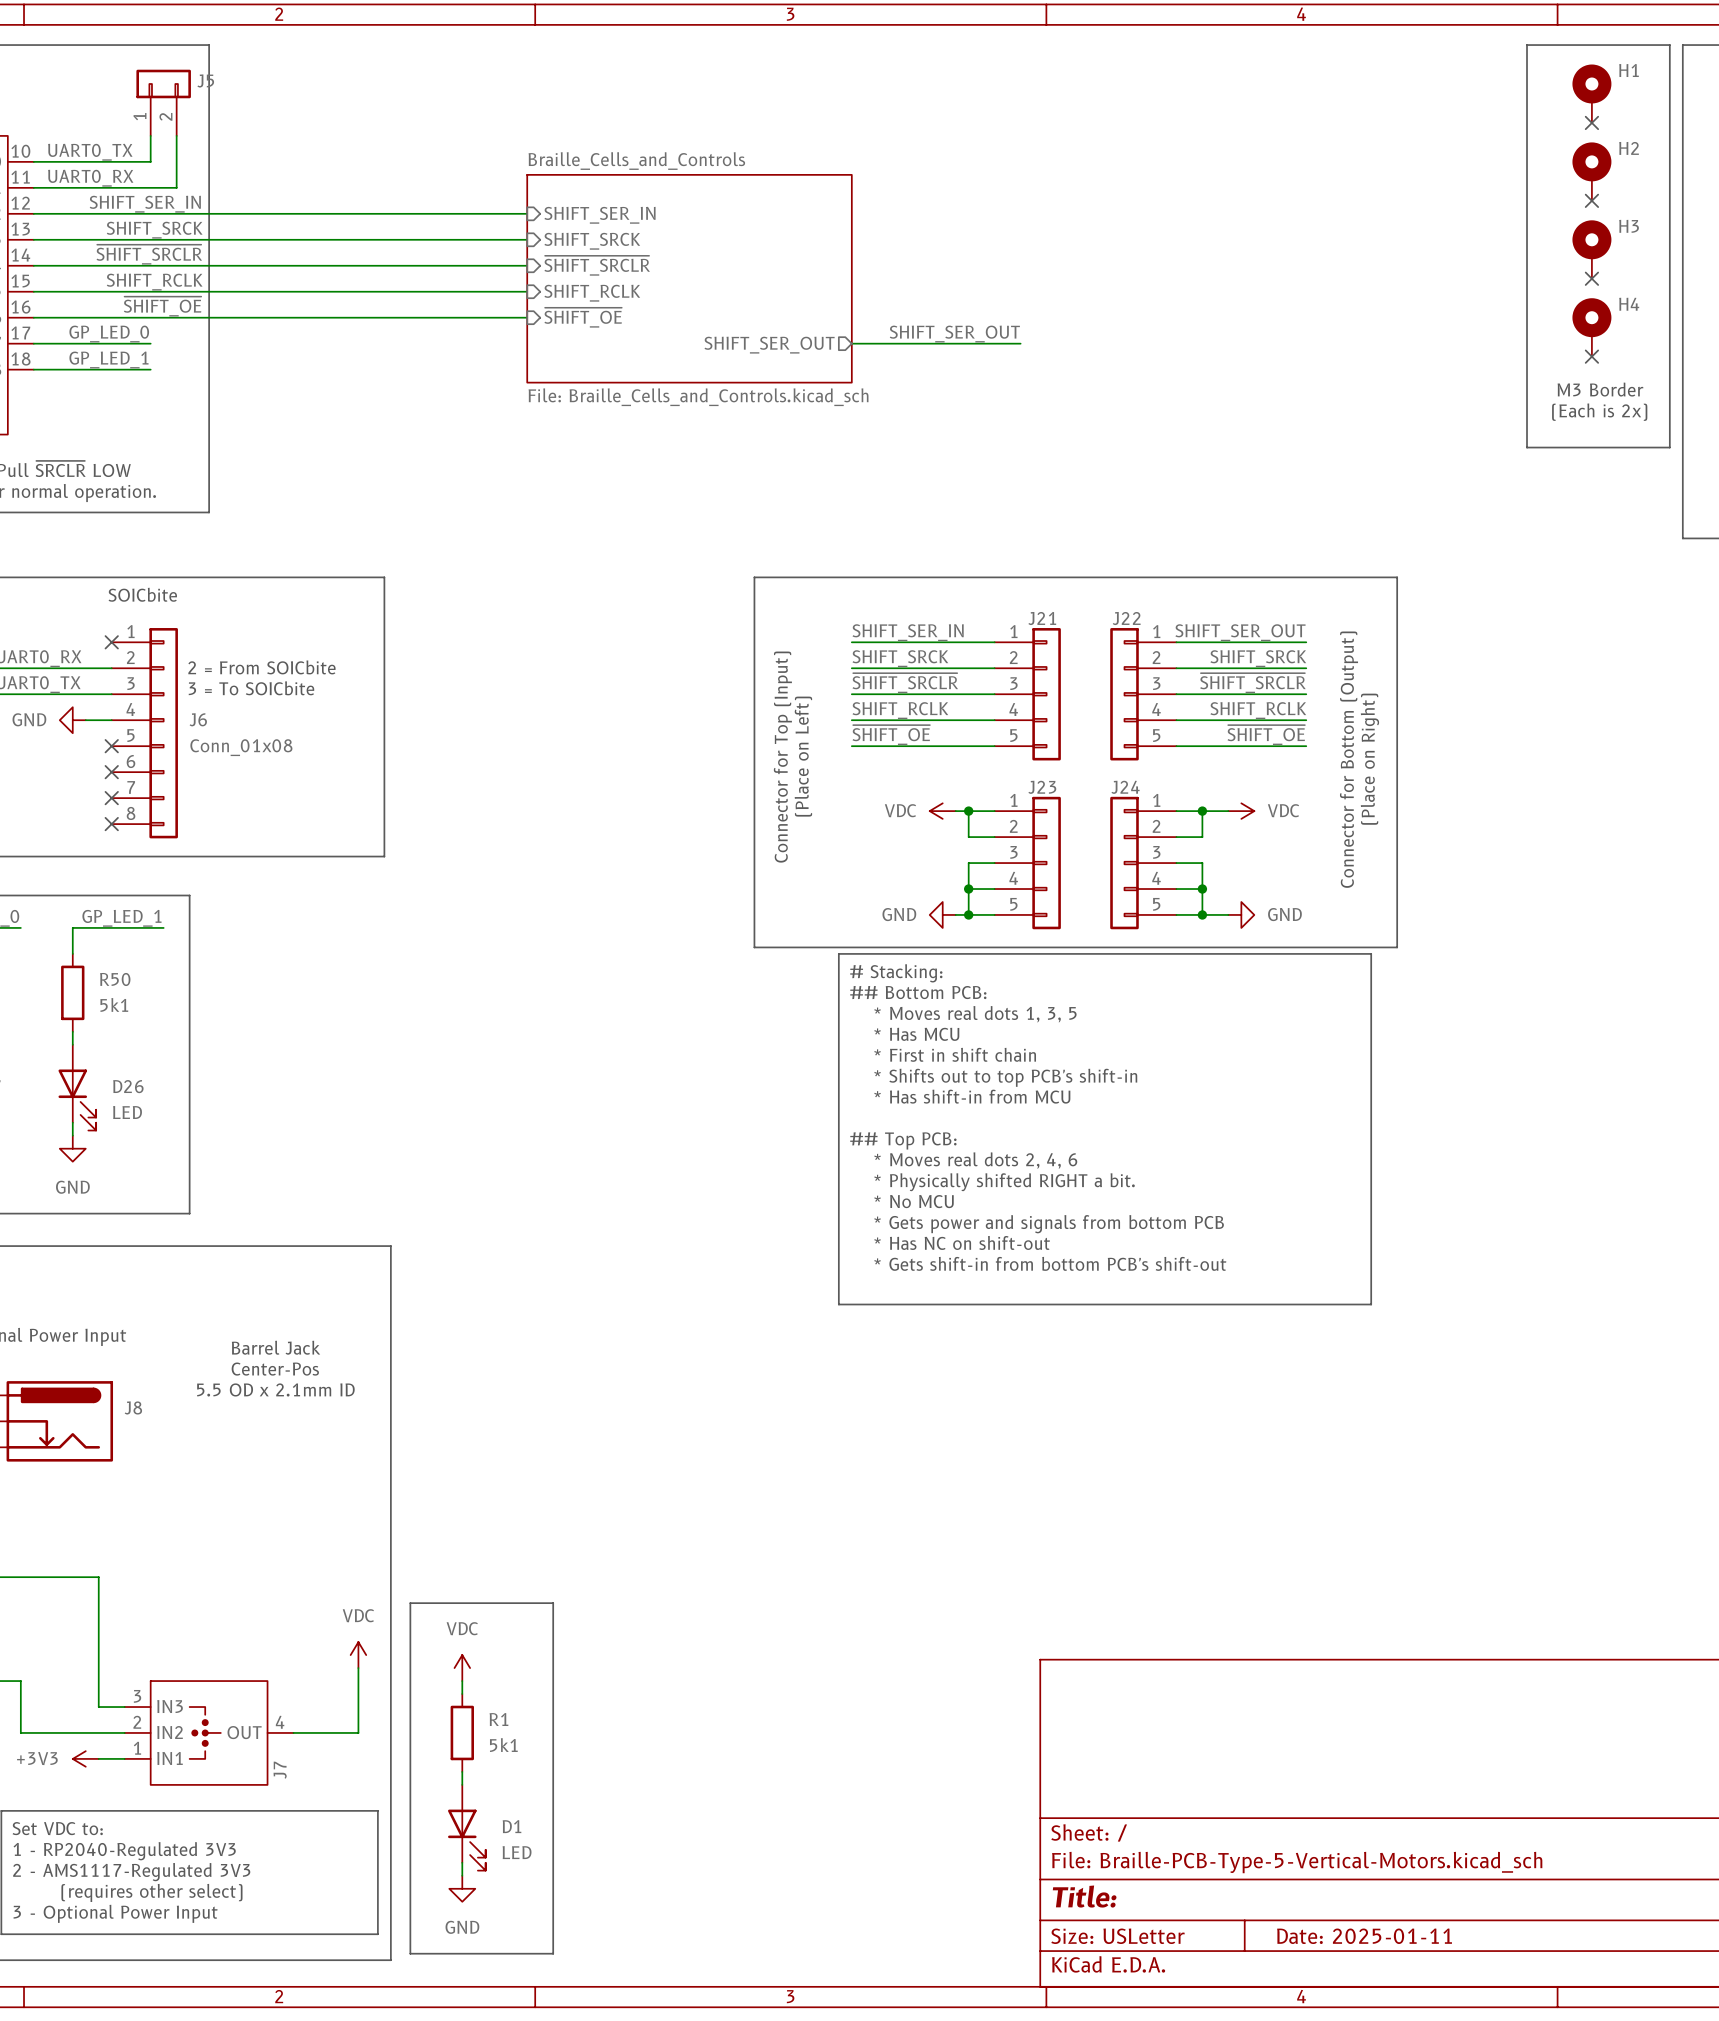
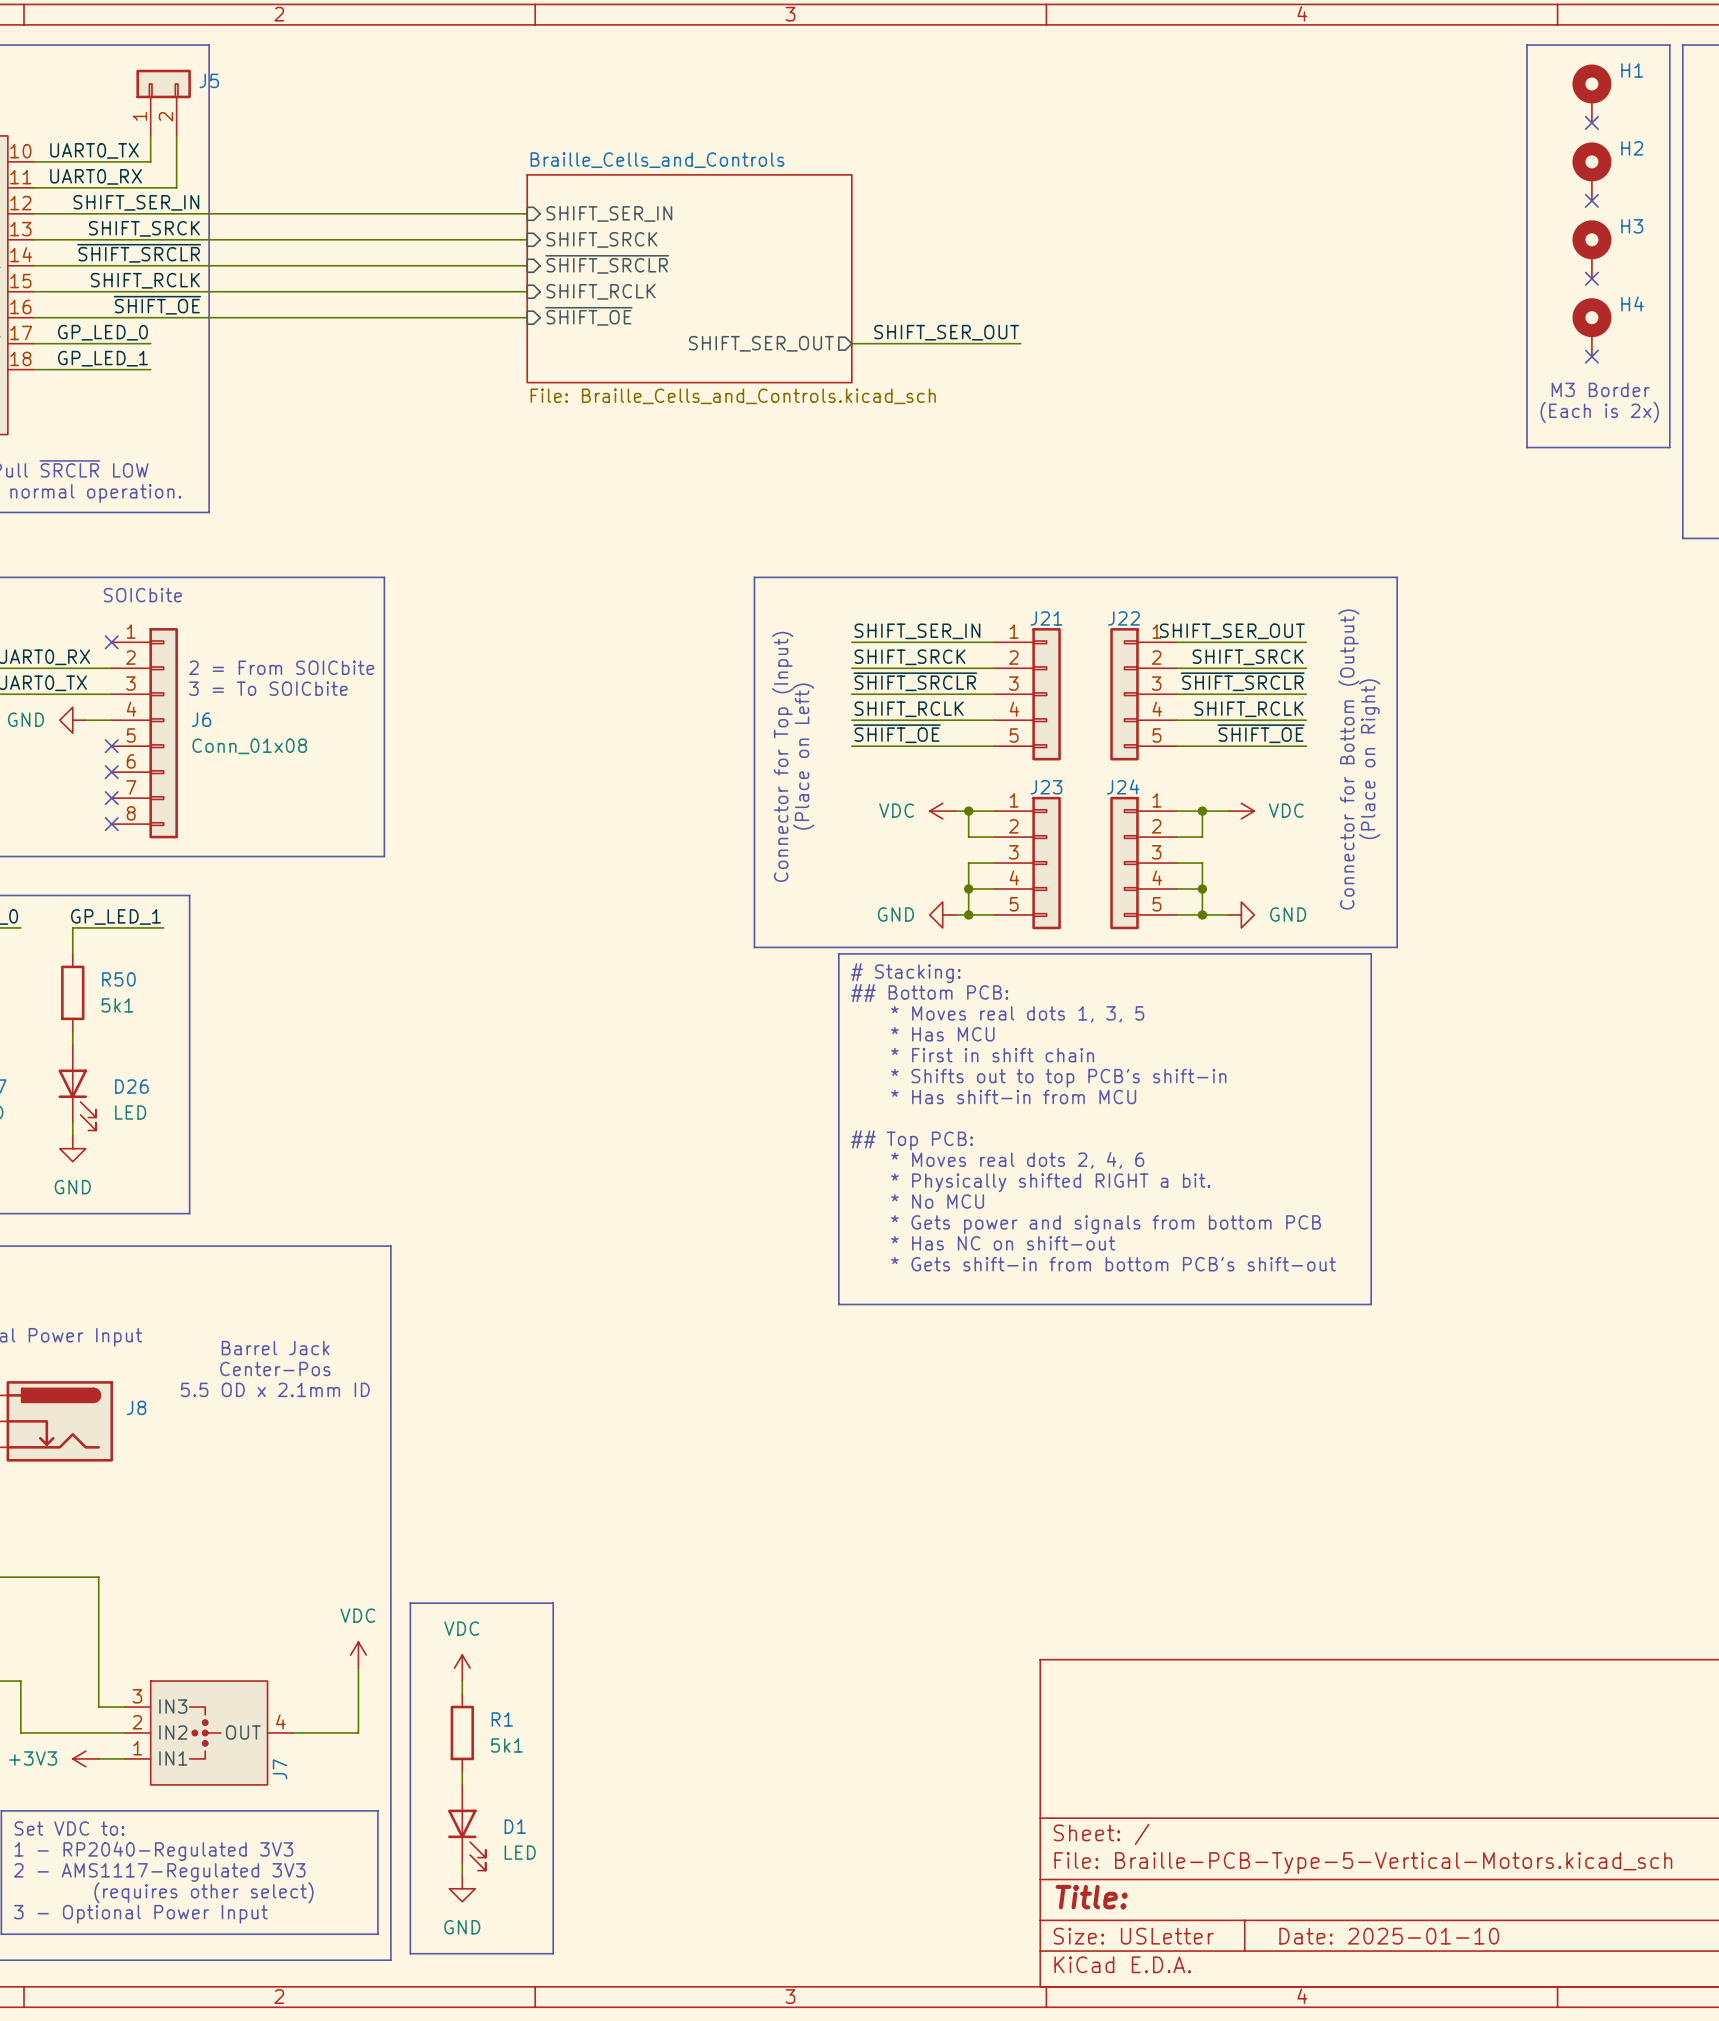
title block: Date: 2025-01-11 (1364, 1936) -> Date: 2025-01-10 (1389, 1936)

